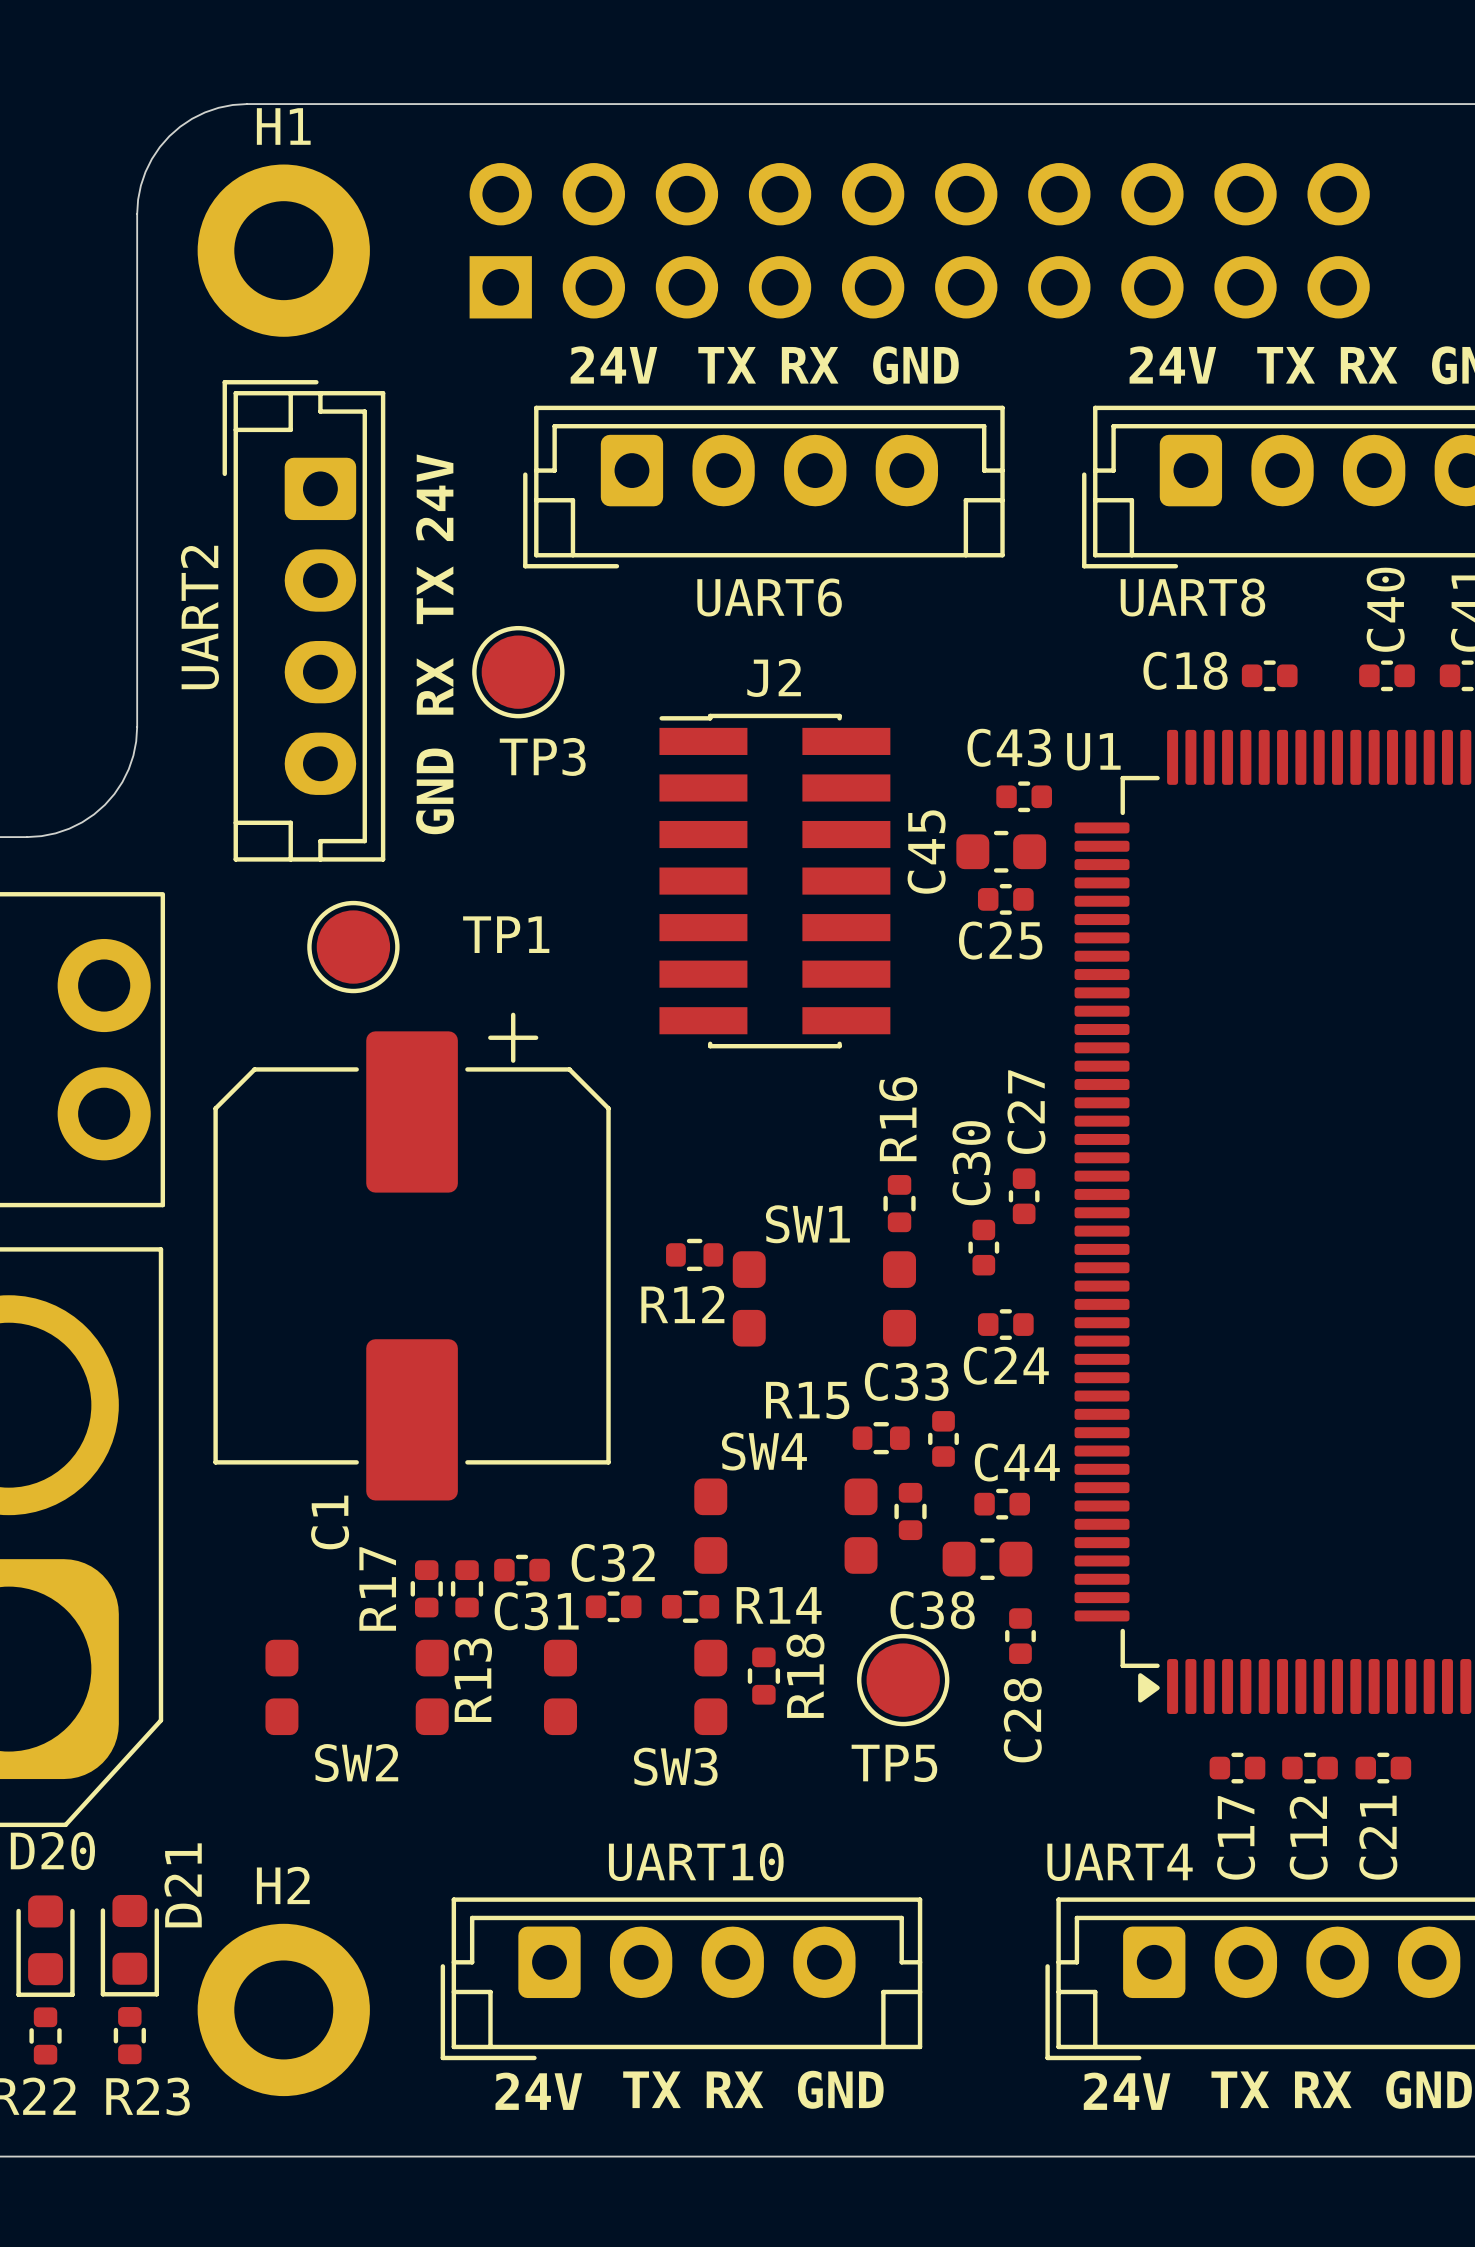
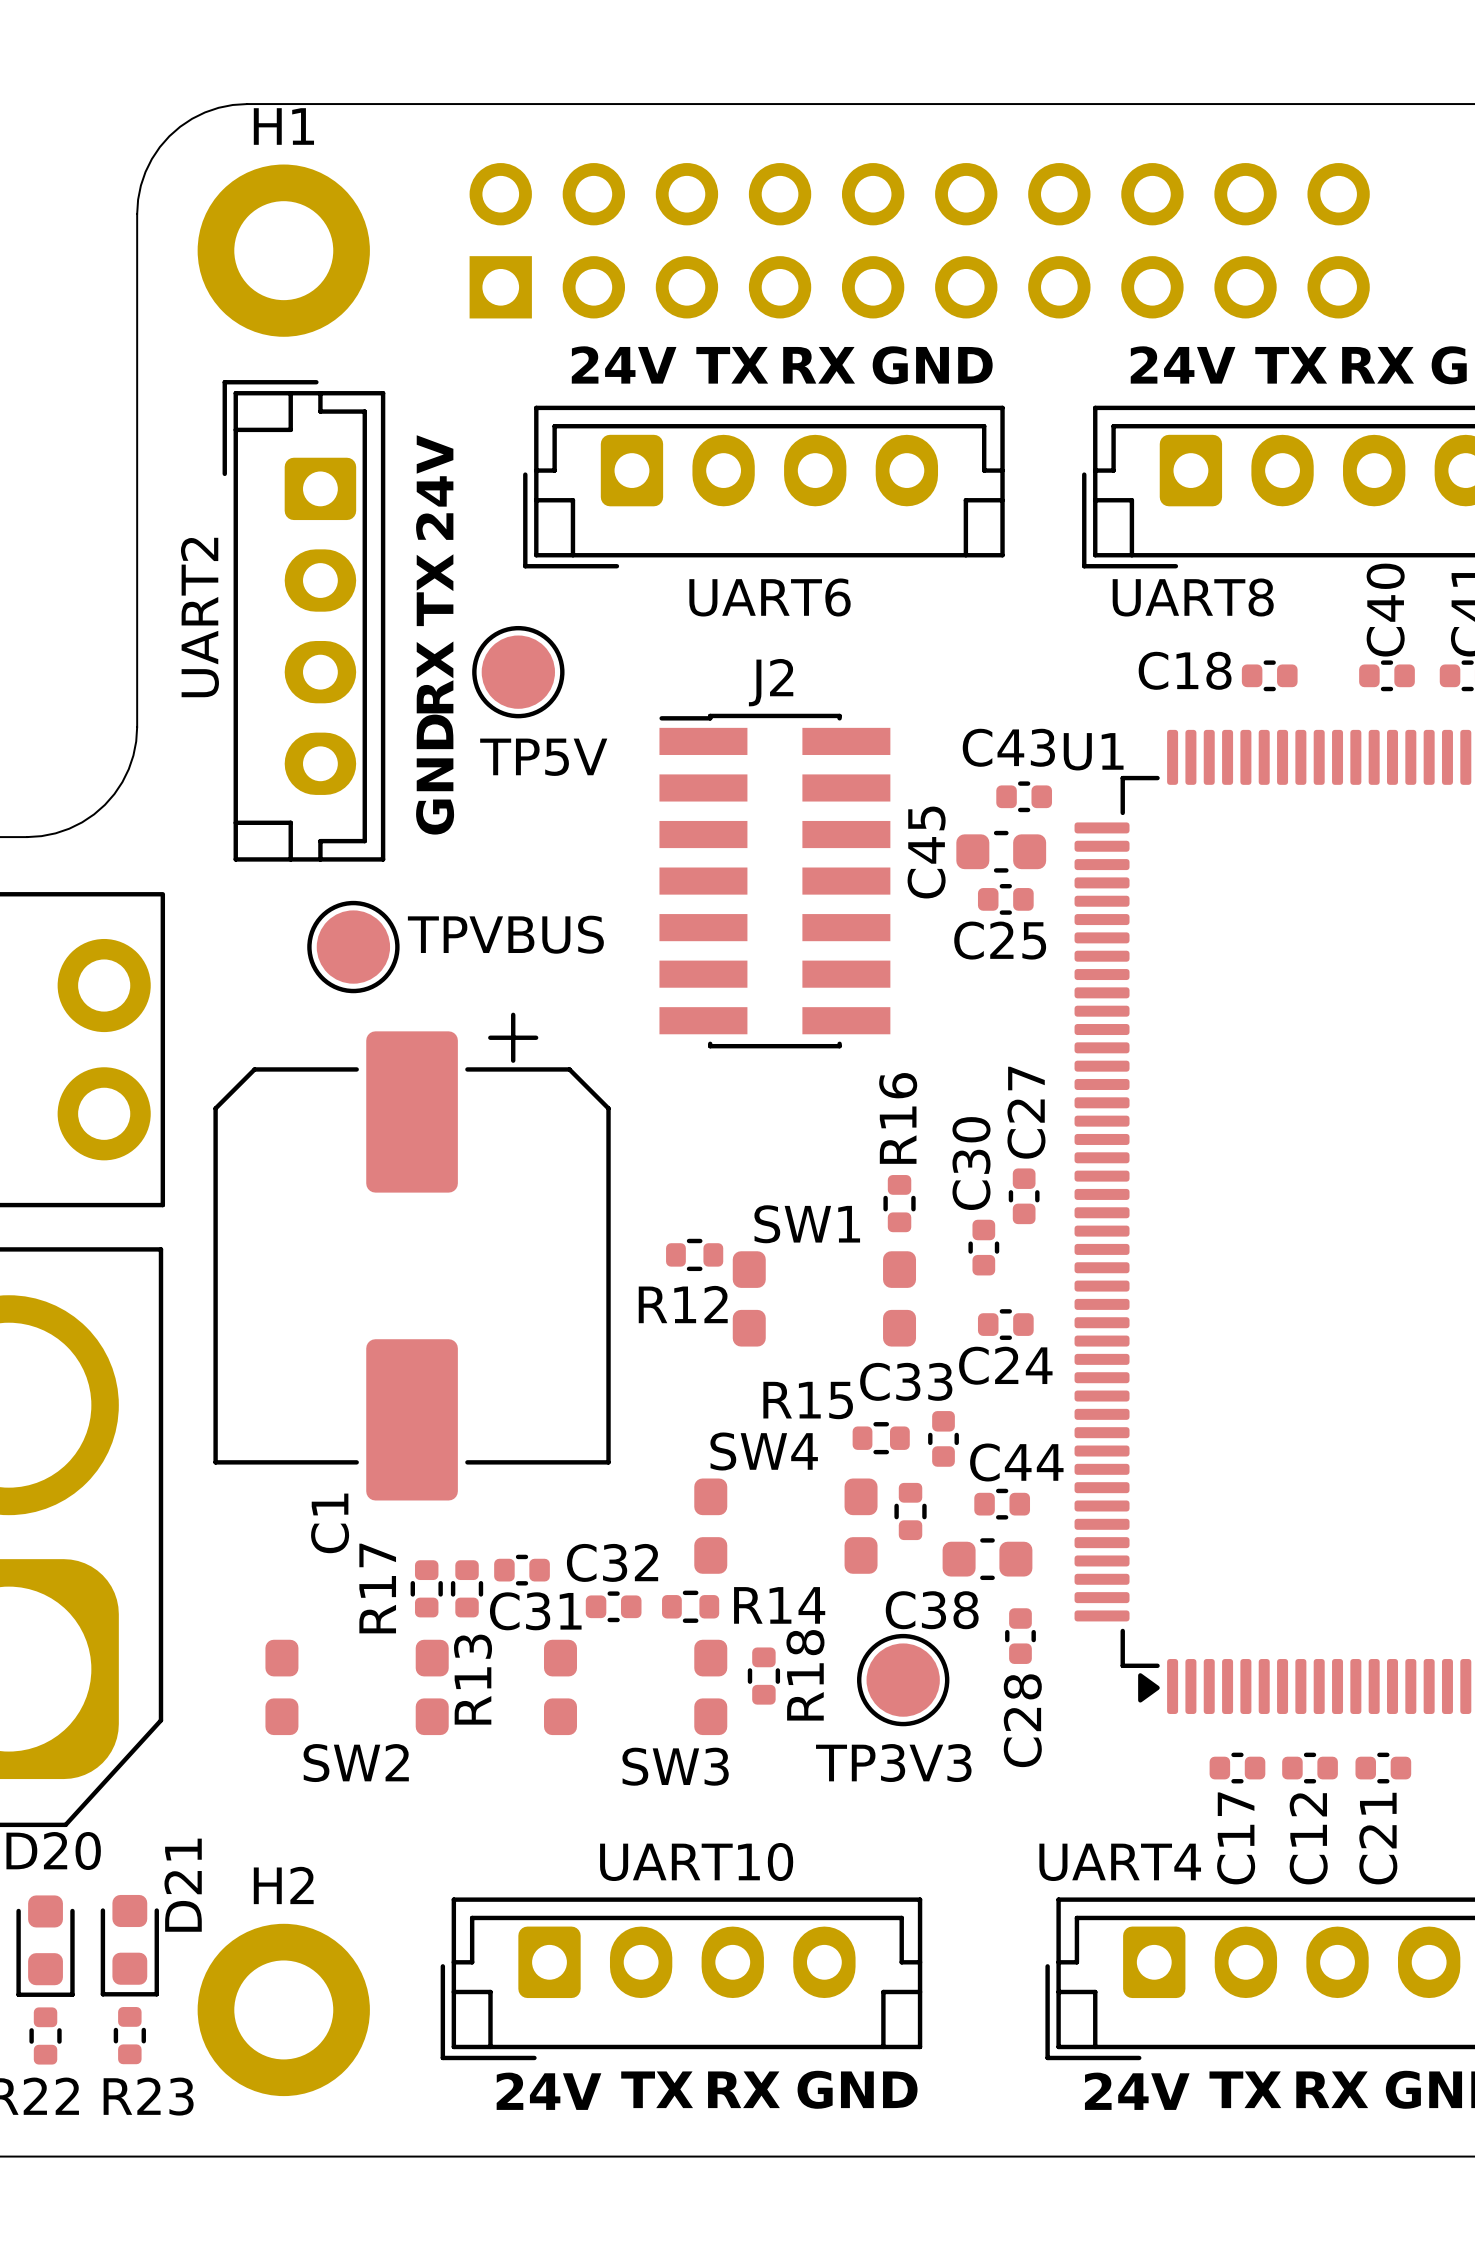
TP3 name: TP3 (542, 756) -> TP5V (543, 757)
TP1 name: TP1 (506, 934) -> TPVBUS (505, 934)
TP5 name: TP5 (894, 1763) -> TP3V3 (893, 1763)

